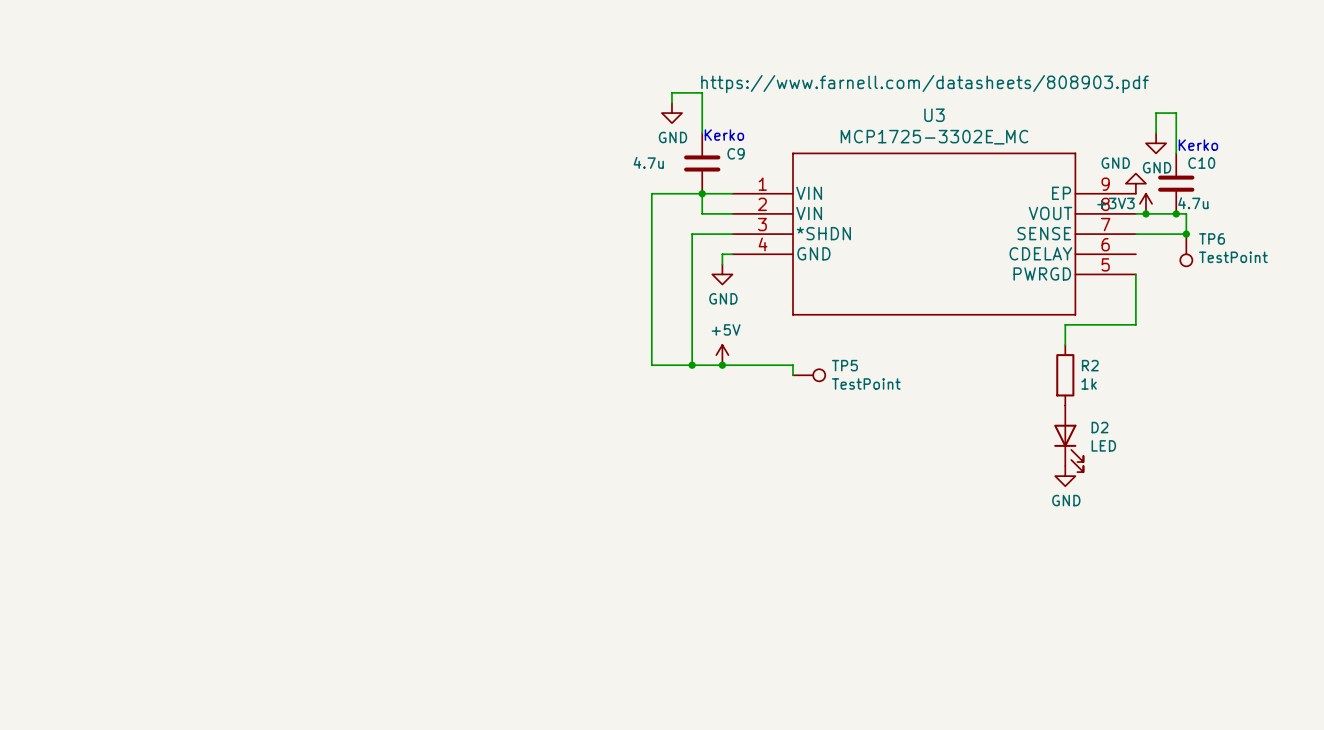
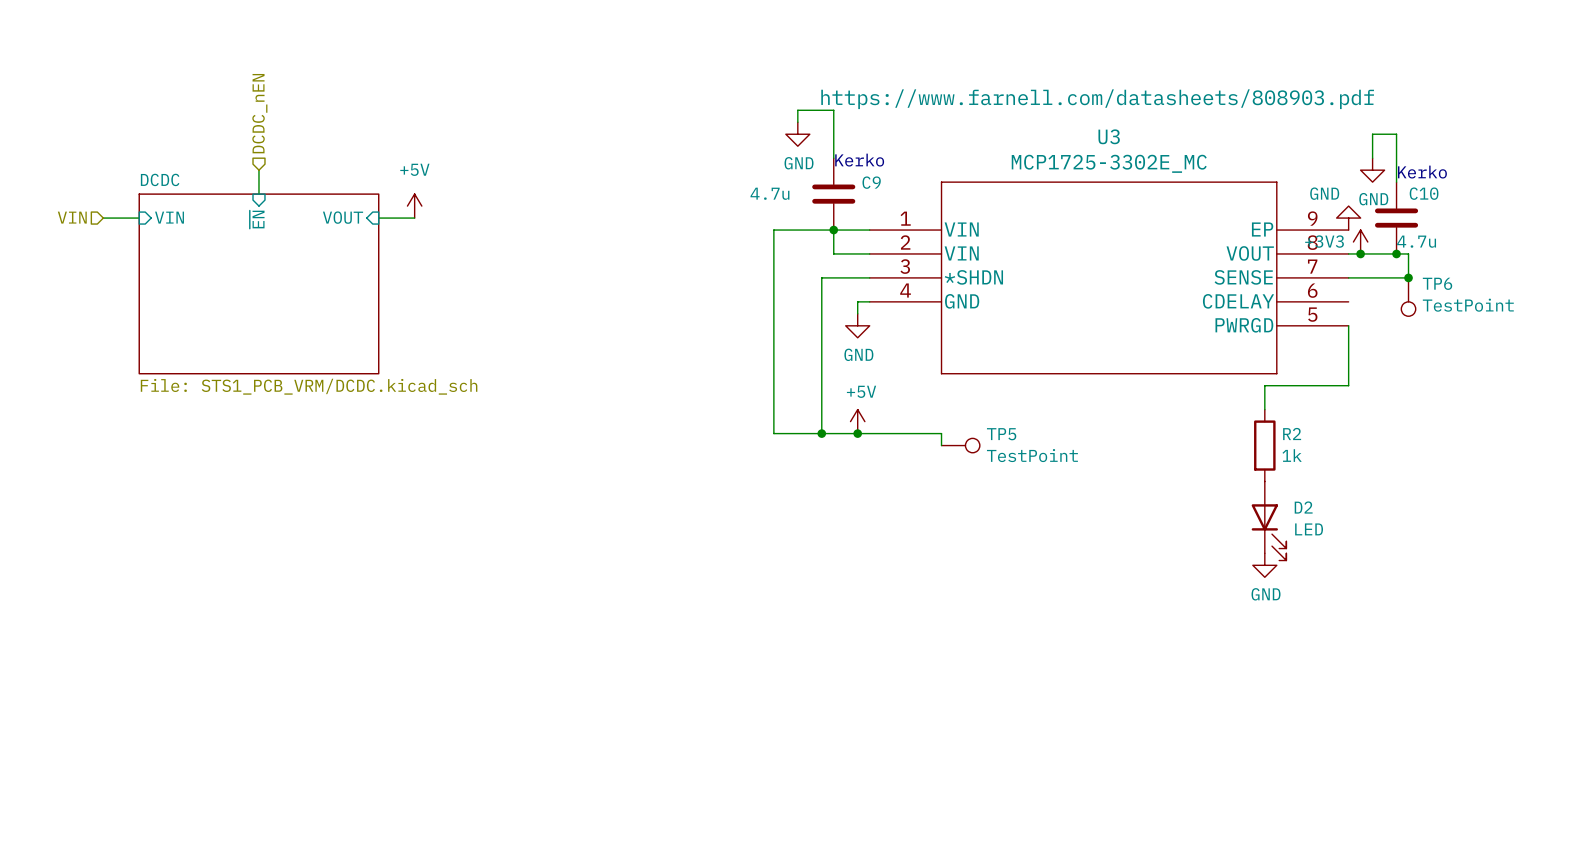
hierarchical label: none -> DCDC_nEN (259, 113)
wire: none -> (258, 170) (258, 194)
power symbol: none -> +5V (414, 206)
hierarchical label: none -> VIN (72, 217)
wire: none -> (103, 218) (139, 218)
sheet pin: none -> VIN (169, 217)
sheet pin: none -> VOUT (343, 217)
wire: none -> (378, 218) (414, 218)
sheet pin: none -> ~{EN} (257, 219)
sheet DCDC: none -> File: STS1_PCB_VRM/DCDC.kicad_sch (258, 283)

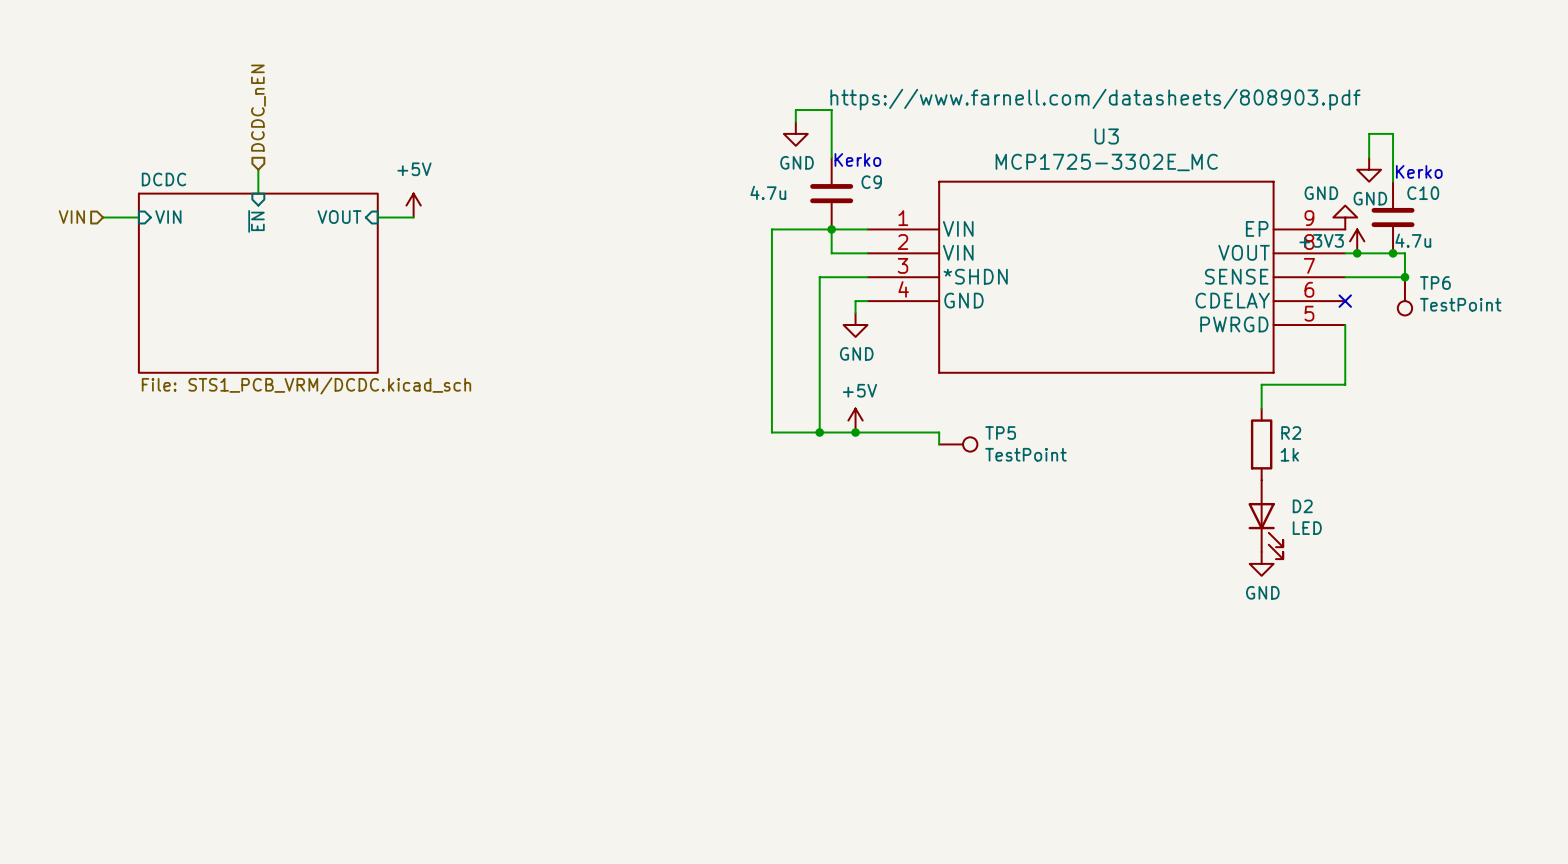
no-connect mark: none -> (1345, 301)

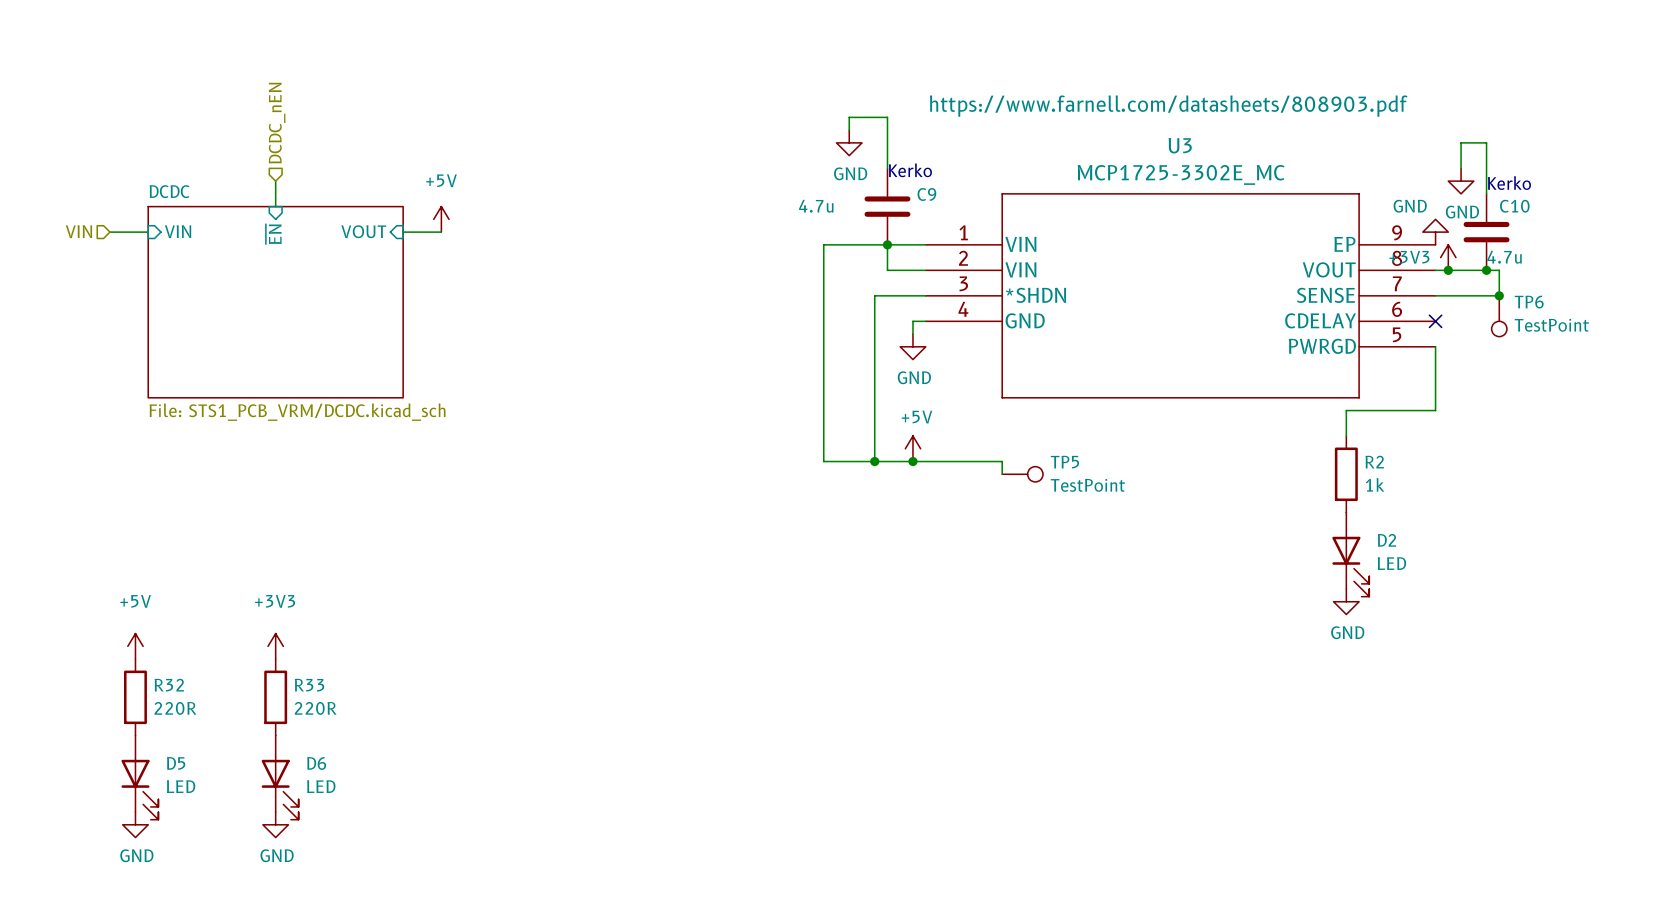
power symbol: none -> +5V (135, 646)
power symbol: none -> +3V3 (275, 646)
R32: none -> 220R (135, 697)
R33: none -> 220R (275, 697)
D5: none -> LED (139, 777)
D6: none -> LED (280, 777)
power symbol: none -> GND (135, 824)
power symbol: none -> GND (275, 824)

